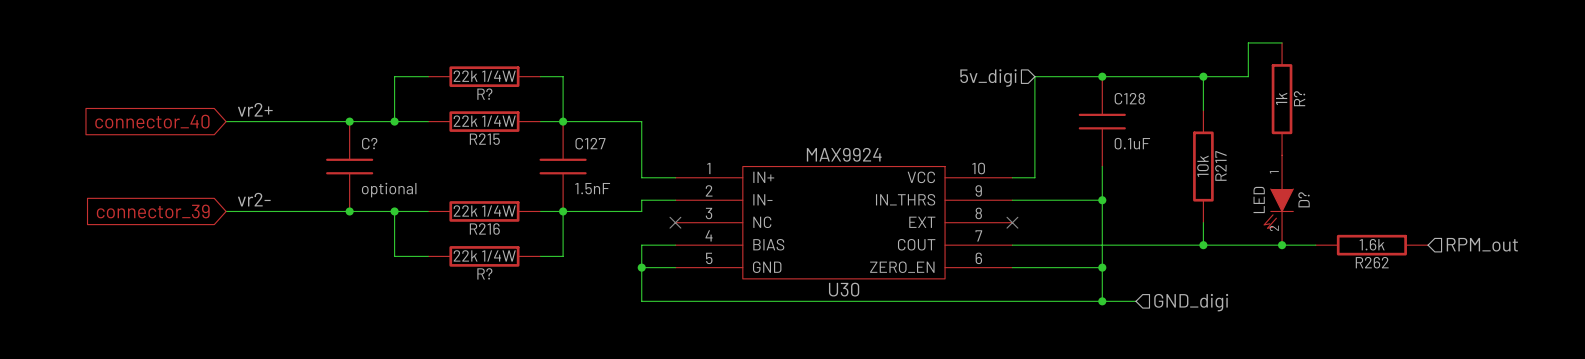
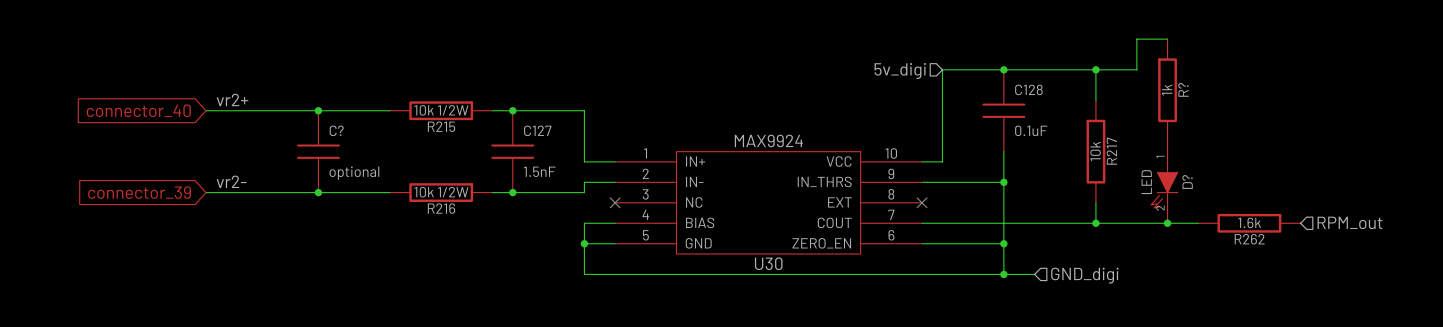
wire: (428, 76) (394, 76) (394, 121) -> none
R?: 22k 1/4W (484, 76) -> none
wire: (540, 76) (563, 76) (563, 121) -> none
junction: (394, 121) -> none
R215 value: 22k 1/4W (484, 121) -> 10k 1/2W (441, 110)
R216 value: 22k 1/4W (484, 210) -> 10k 1/2W (441, 192)
wire: (394, 211) (394, 256) (428, 256) -> none
junction: (394, 211) -> none
wire: (563, 211) (563, 256) (540, 256) -> none
R?: 22k 1/4W (484, 256) -> none

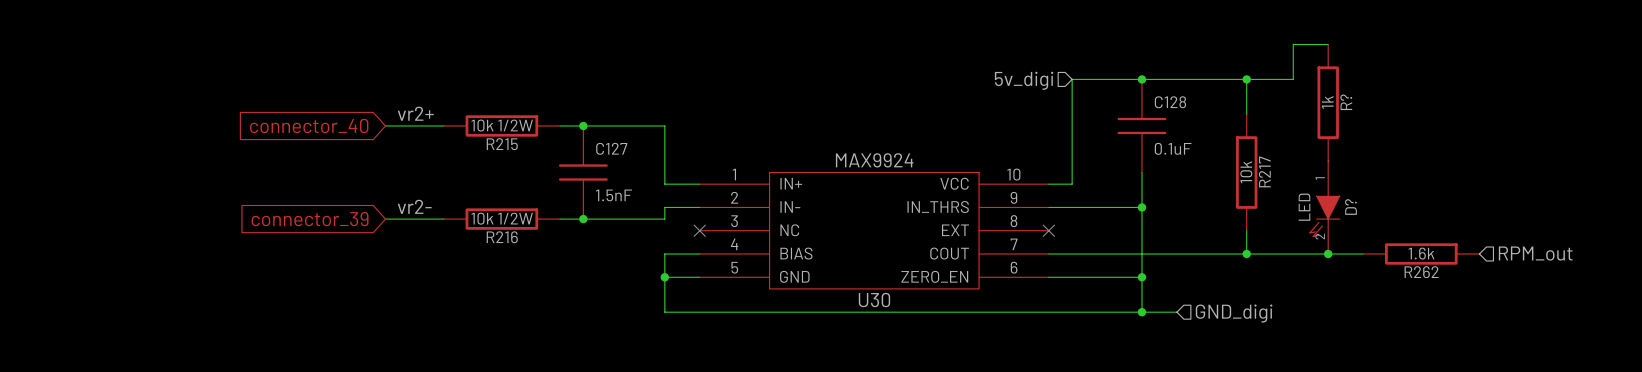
label position: vr2+ (232, 99) -> vr2+ (415, 113)
global label position: connector_40 (138, 110) -> connector_40 (309, 125)
wire: (205, 110) (338, 110) -> none
junction: (318, 110) -> none
C?: optional (318, 151) -> none
label position: vr2- (231, 181) -> vr2- (414, 206)
global label position: connector_39 (139, 192) -> connector_39 (310, 219)
wire: (205, 192) (338, 192) -> none
junction: (318, 192) -> none

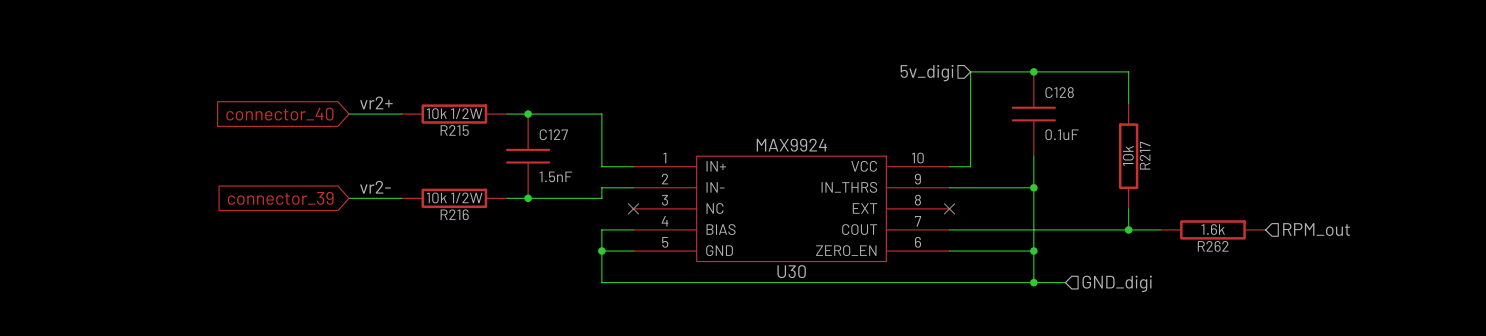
wire: (1328, 44) (1293, 44) (1293, 79) (1246, 79) -> none
junction: (1246, 79) -> none
R?: 1k (1328, 102) -> none
D?: LED (1324, 207) -> none
wire: (1281, 253) (1363, 253) -> none
junction: (1328, 253) -> none
R262 position: (1421, 253) -> (1212, 229)
hierarchical label position: RPM_out (1535, 253) -> RPM_out (1316, 229)

